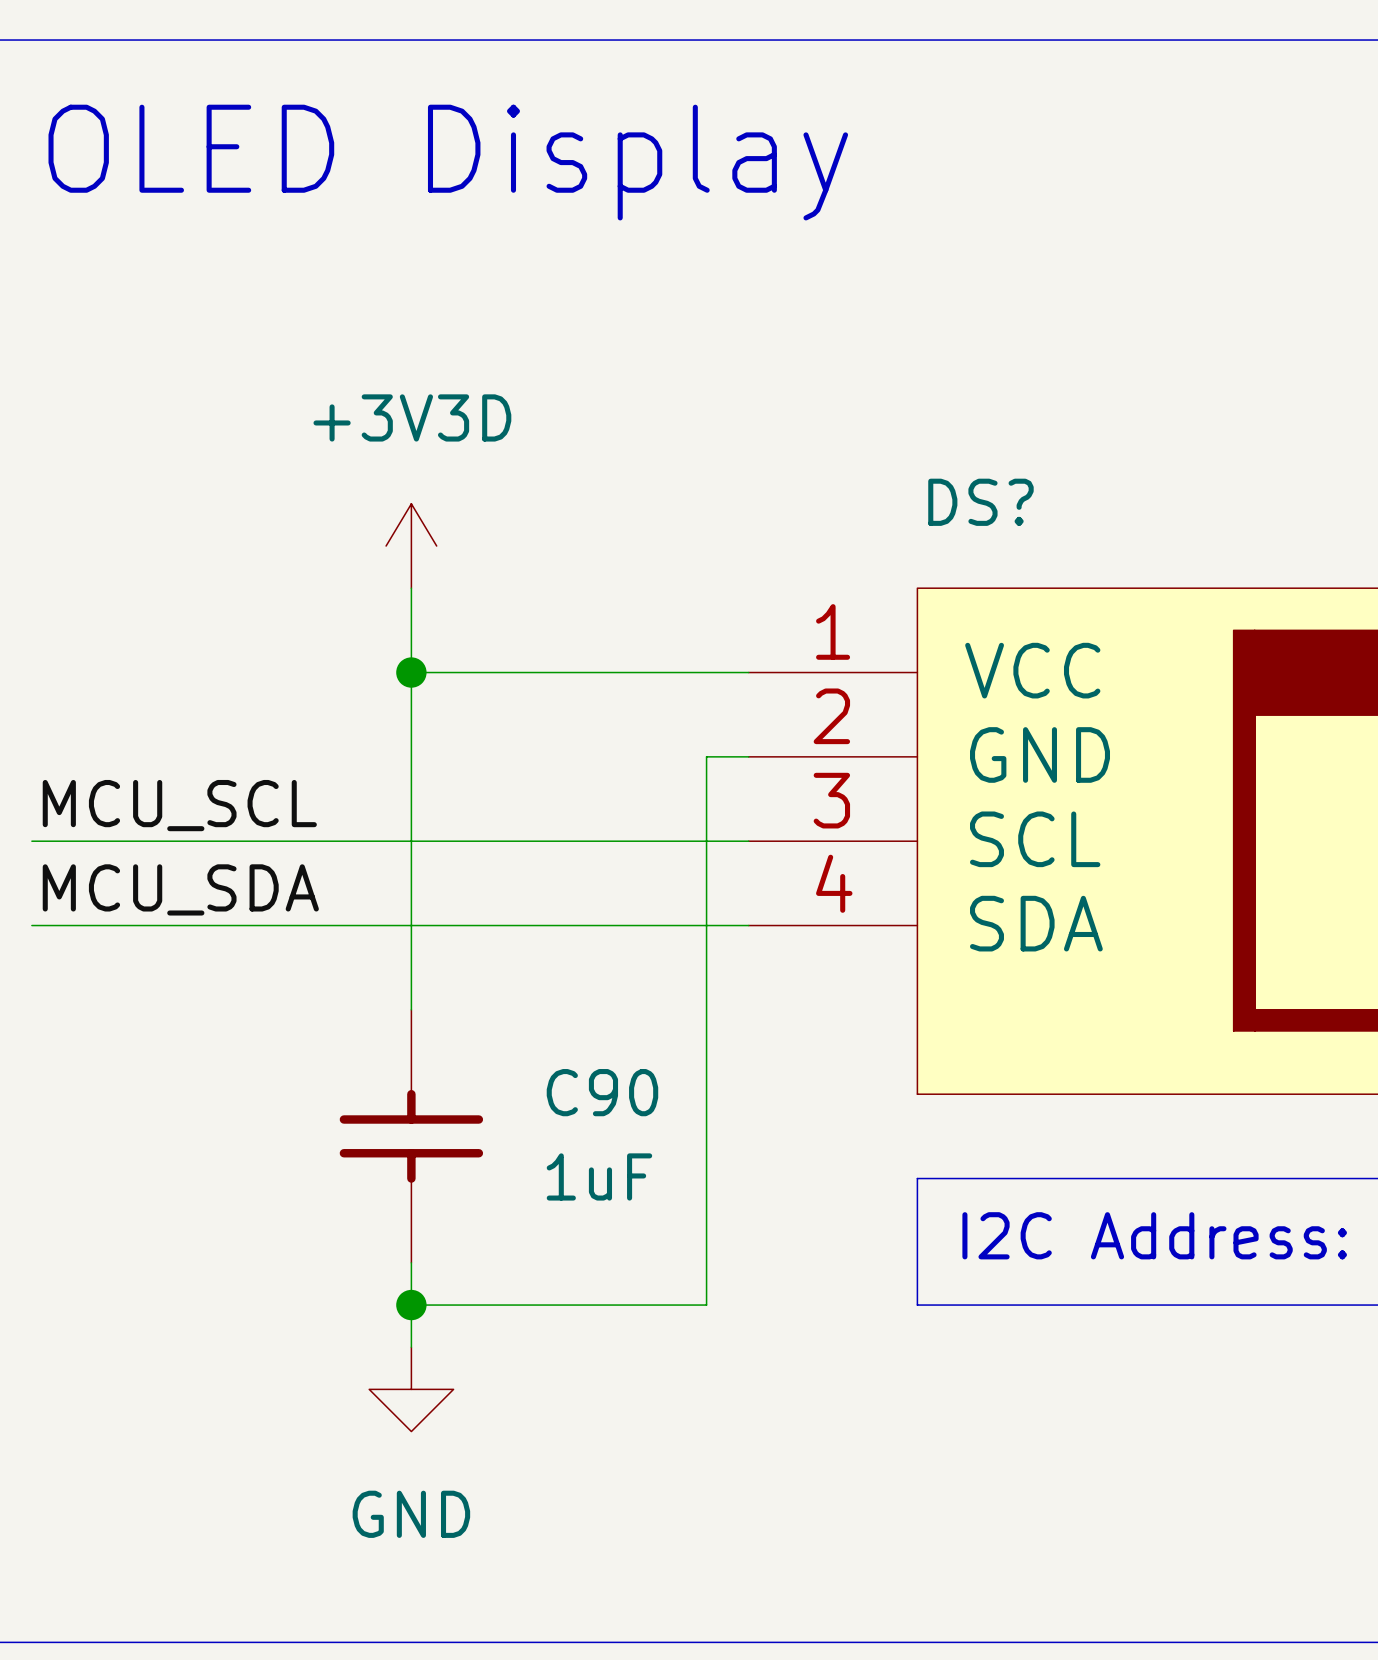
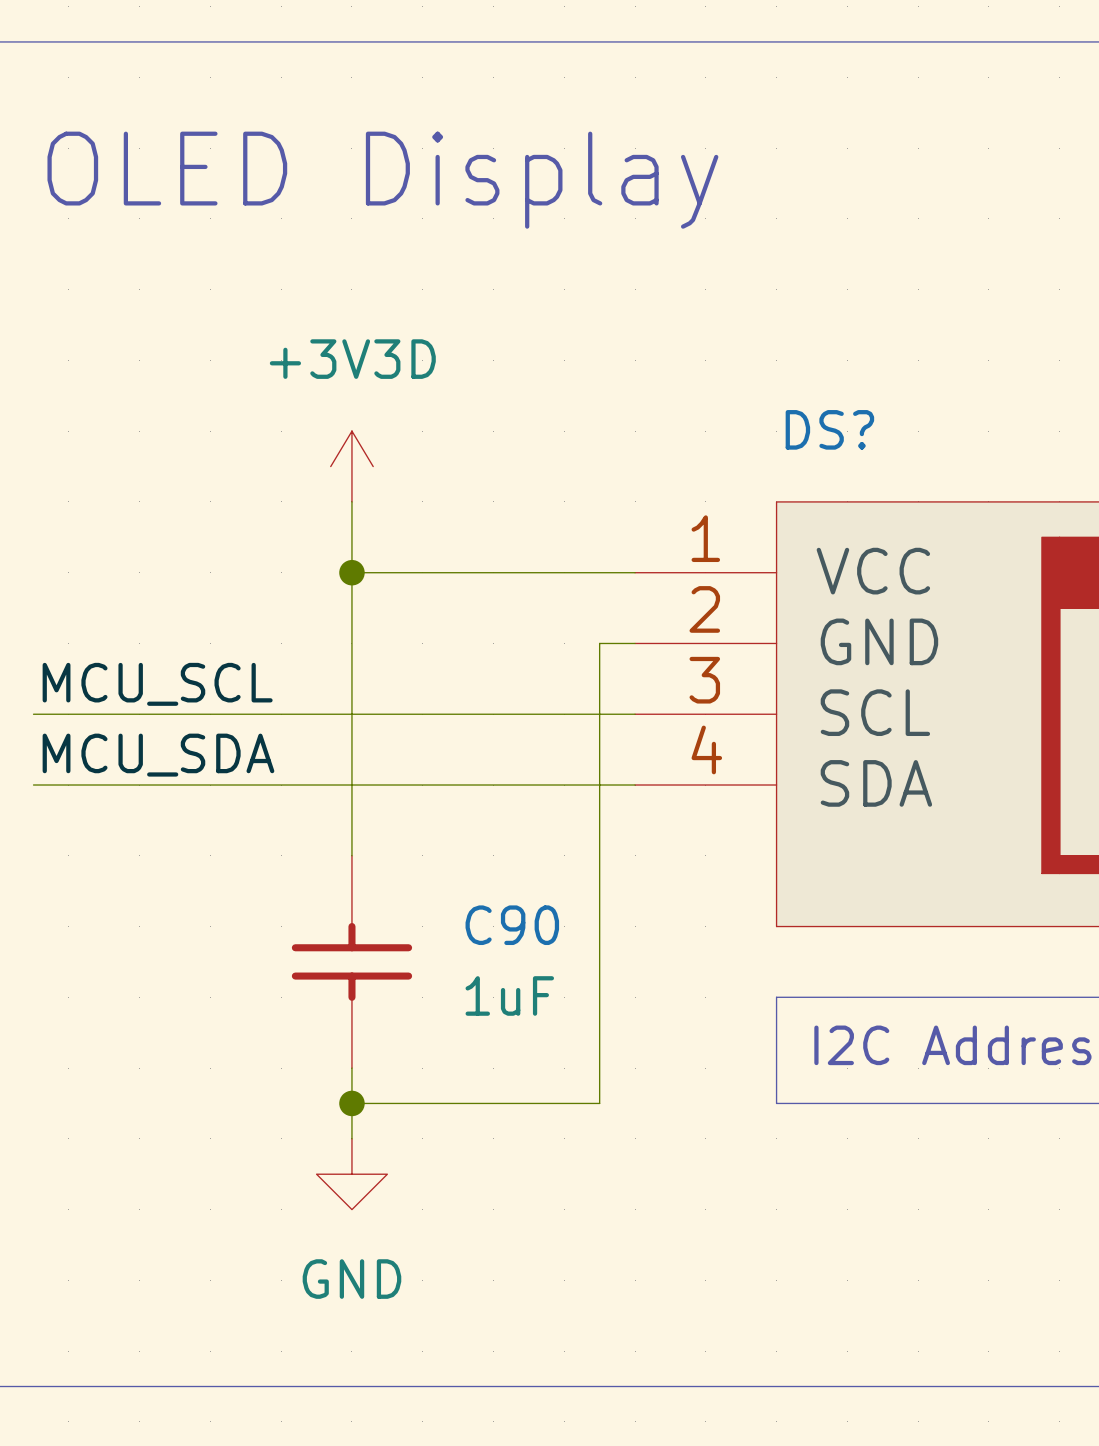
text position: OLED Display (448, 162) -> OLED Display (382, 180)

